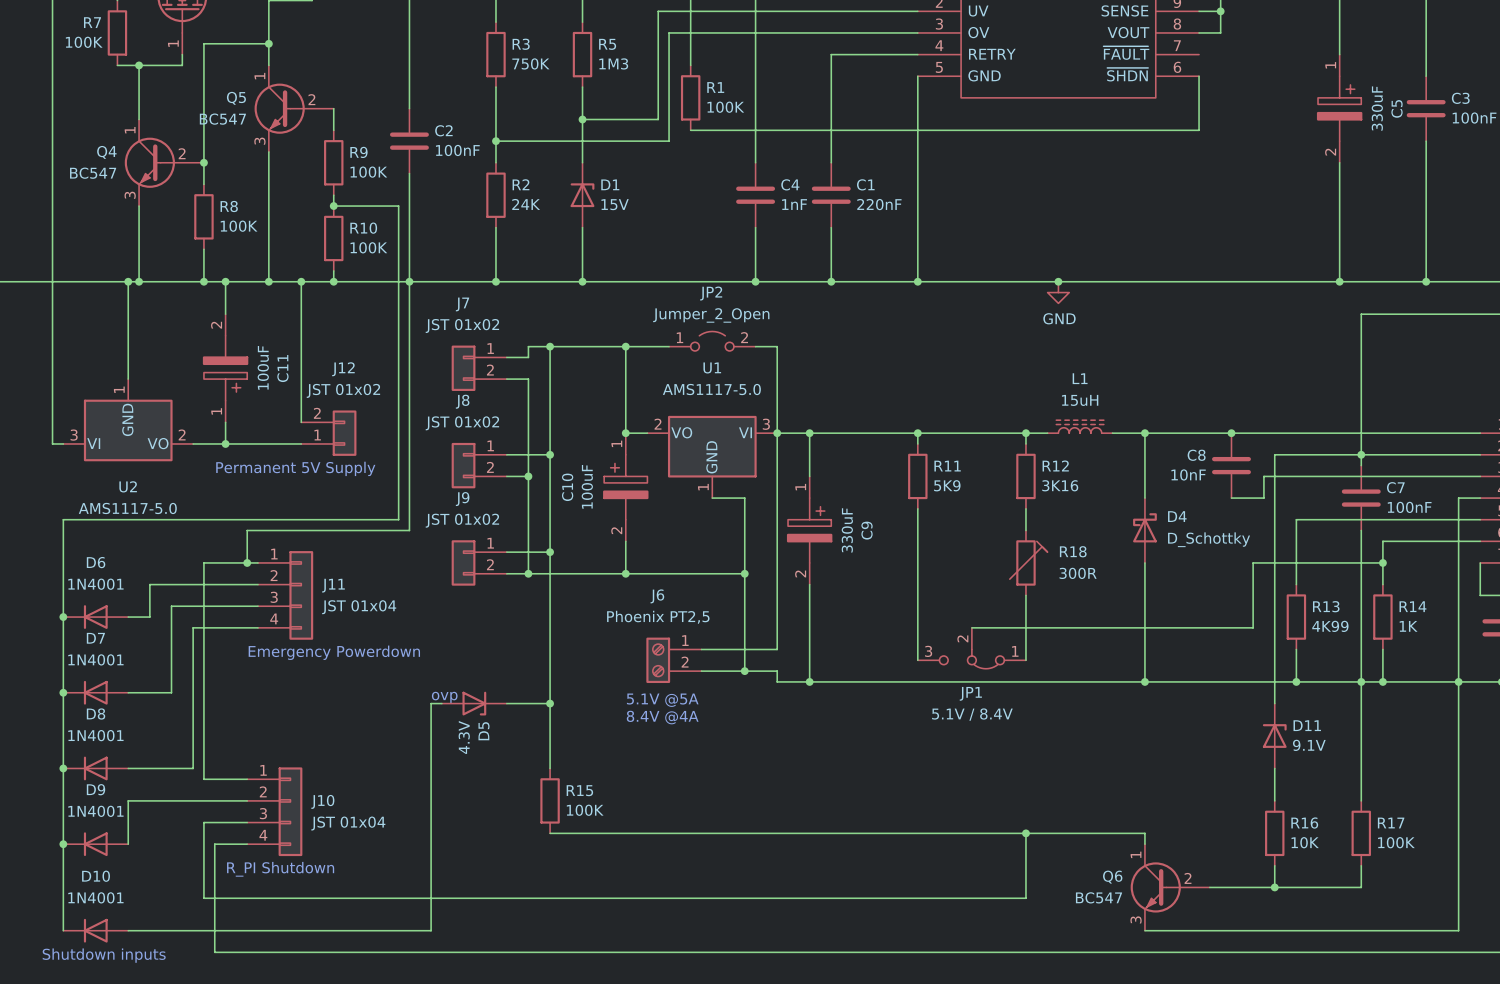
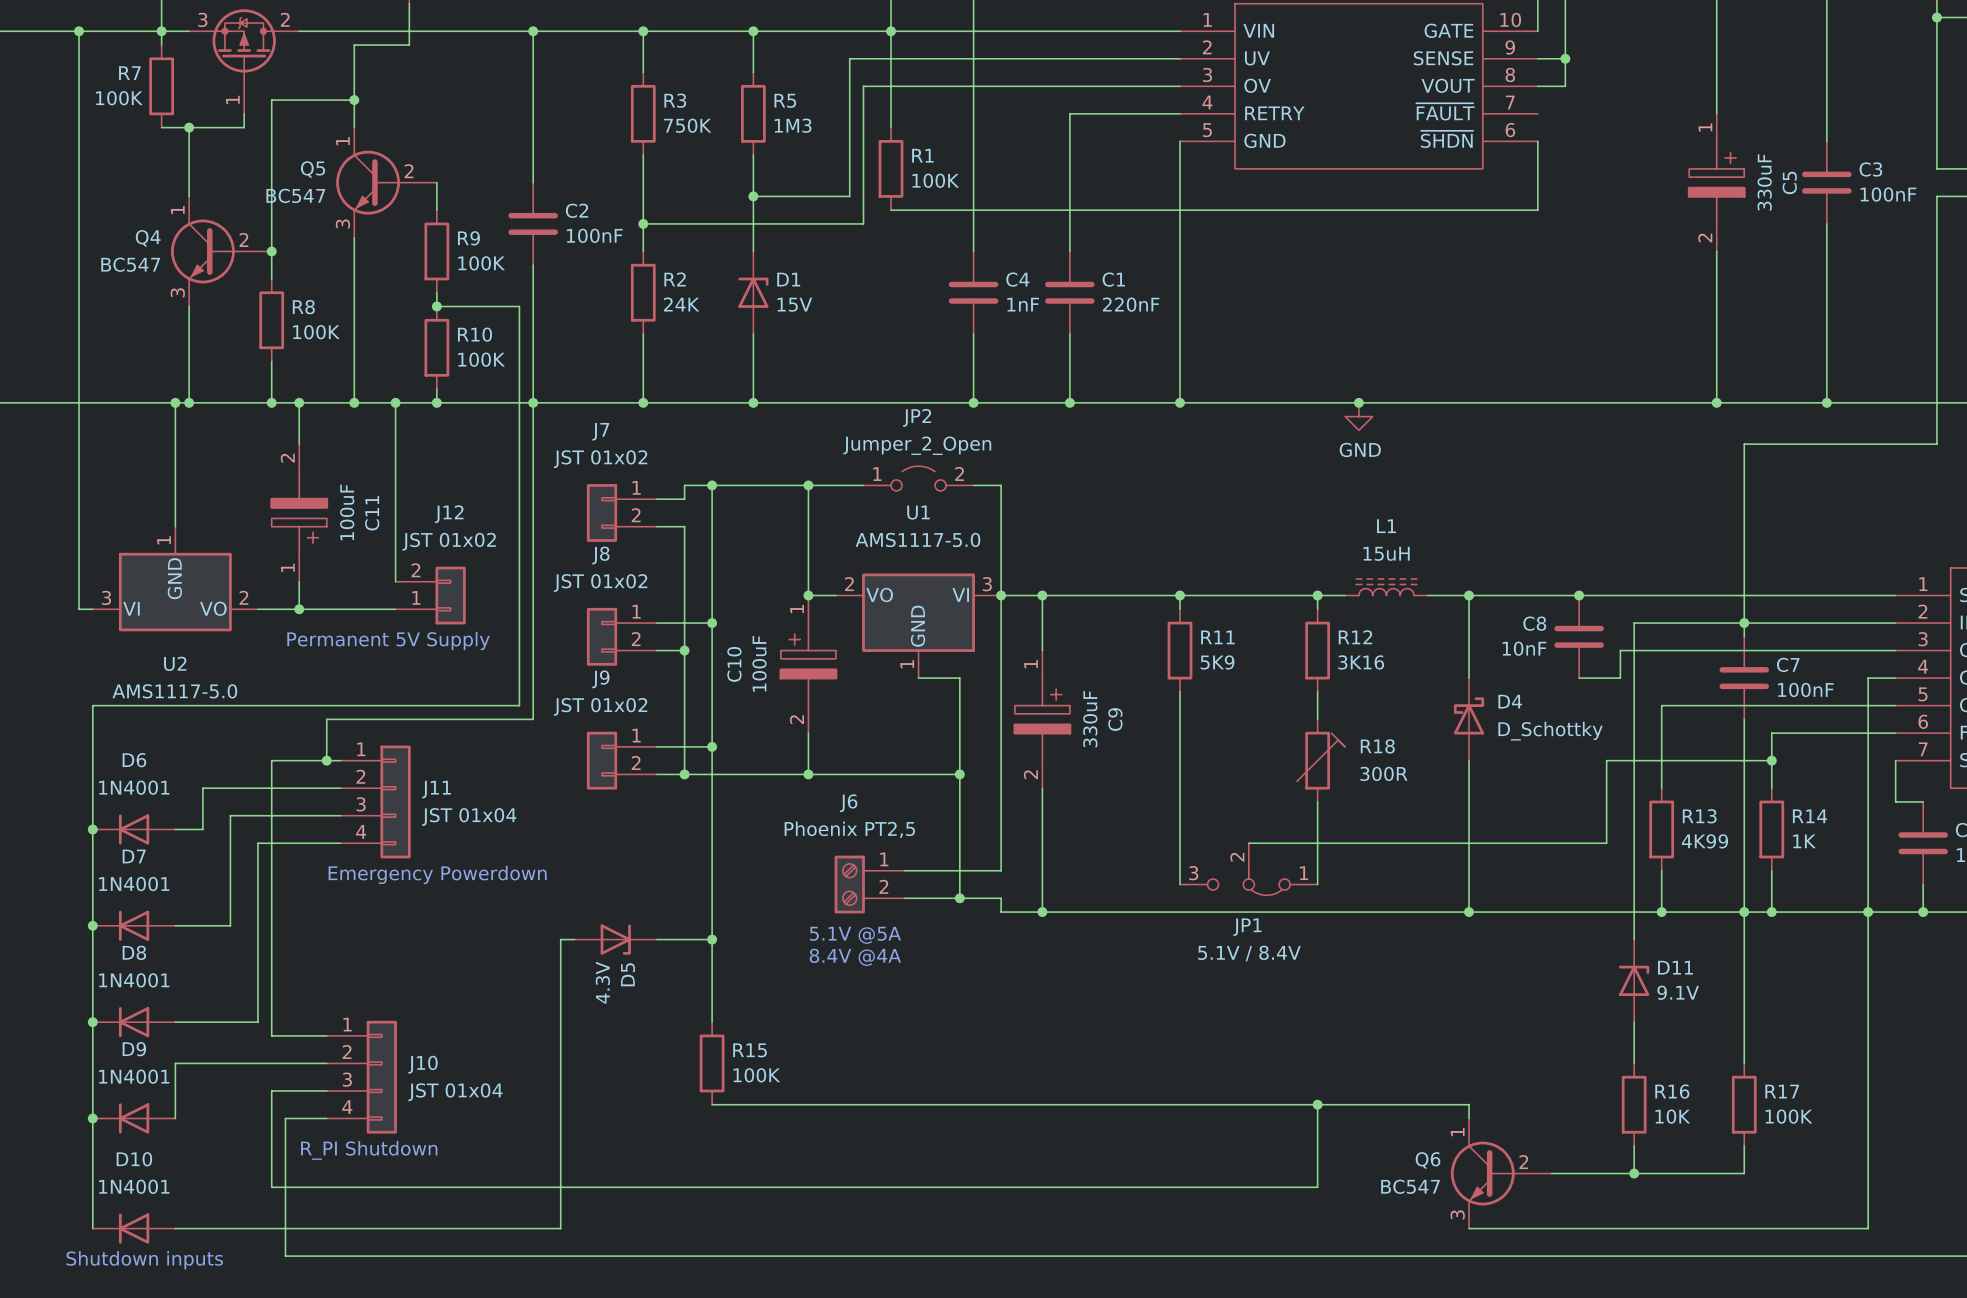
text: ovp (444, 697) -> none

